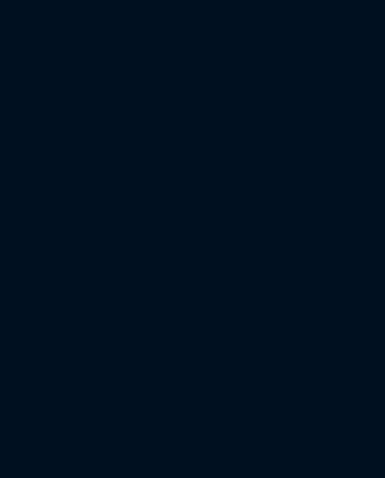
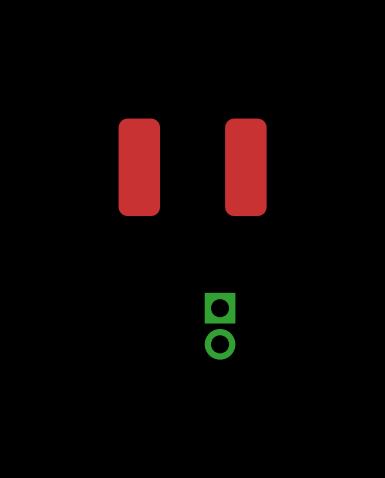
part: none -> (192, 167)
part: none -> (220, 326)

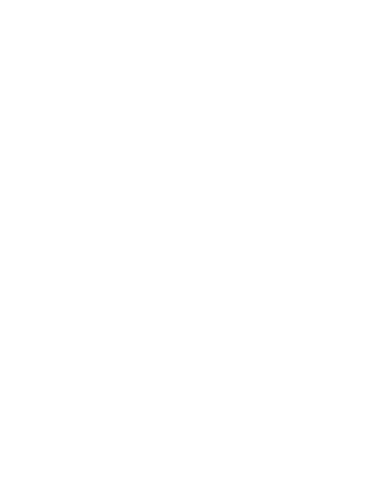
part: (192, 167) -> none
part: (220, 326) -> none

